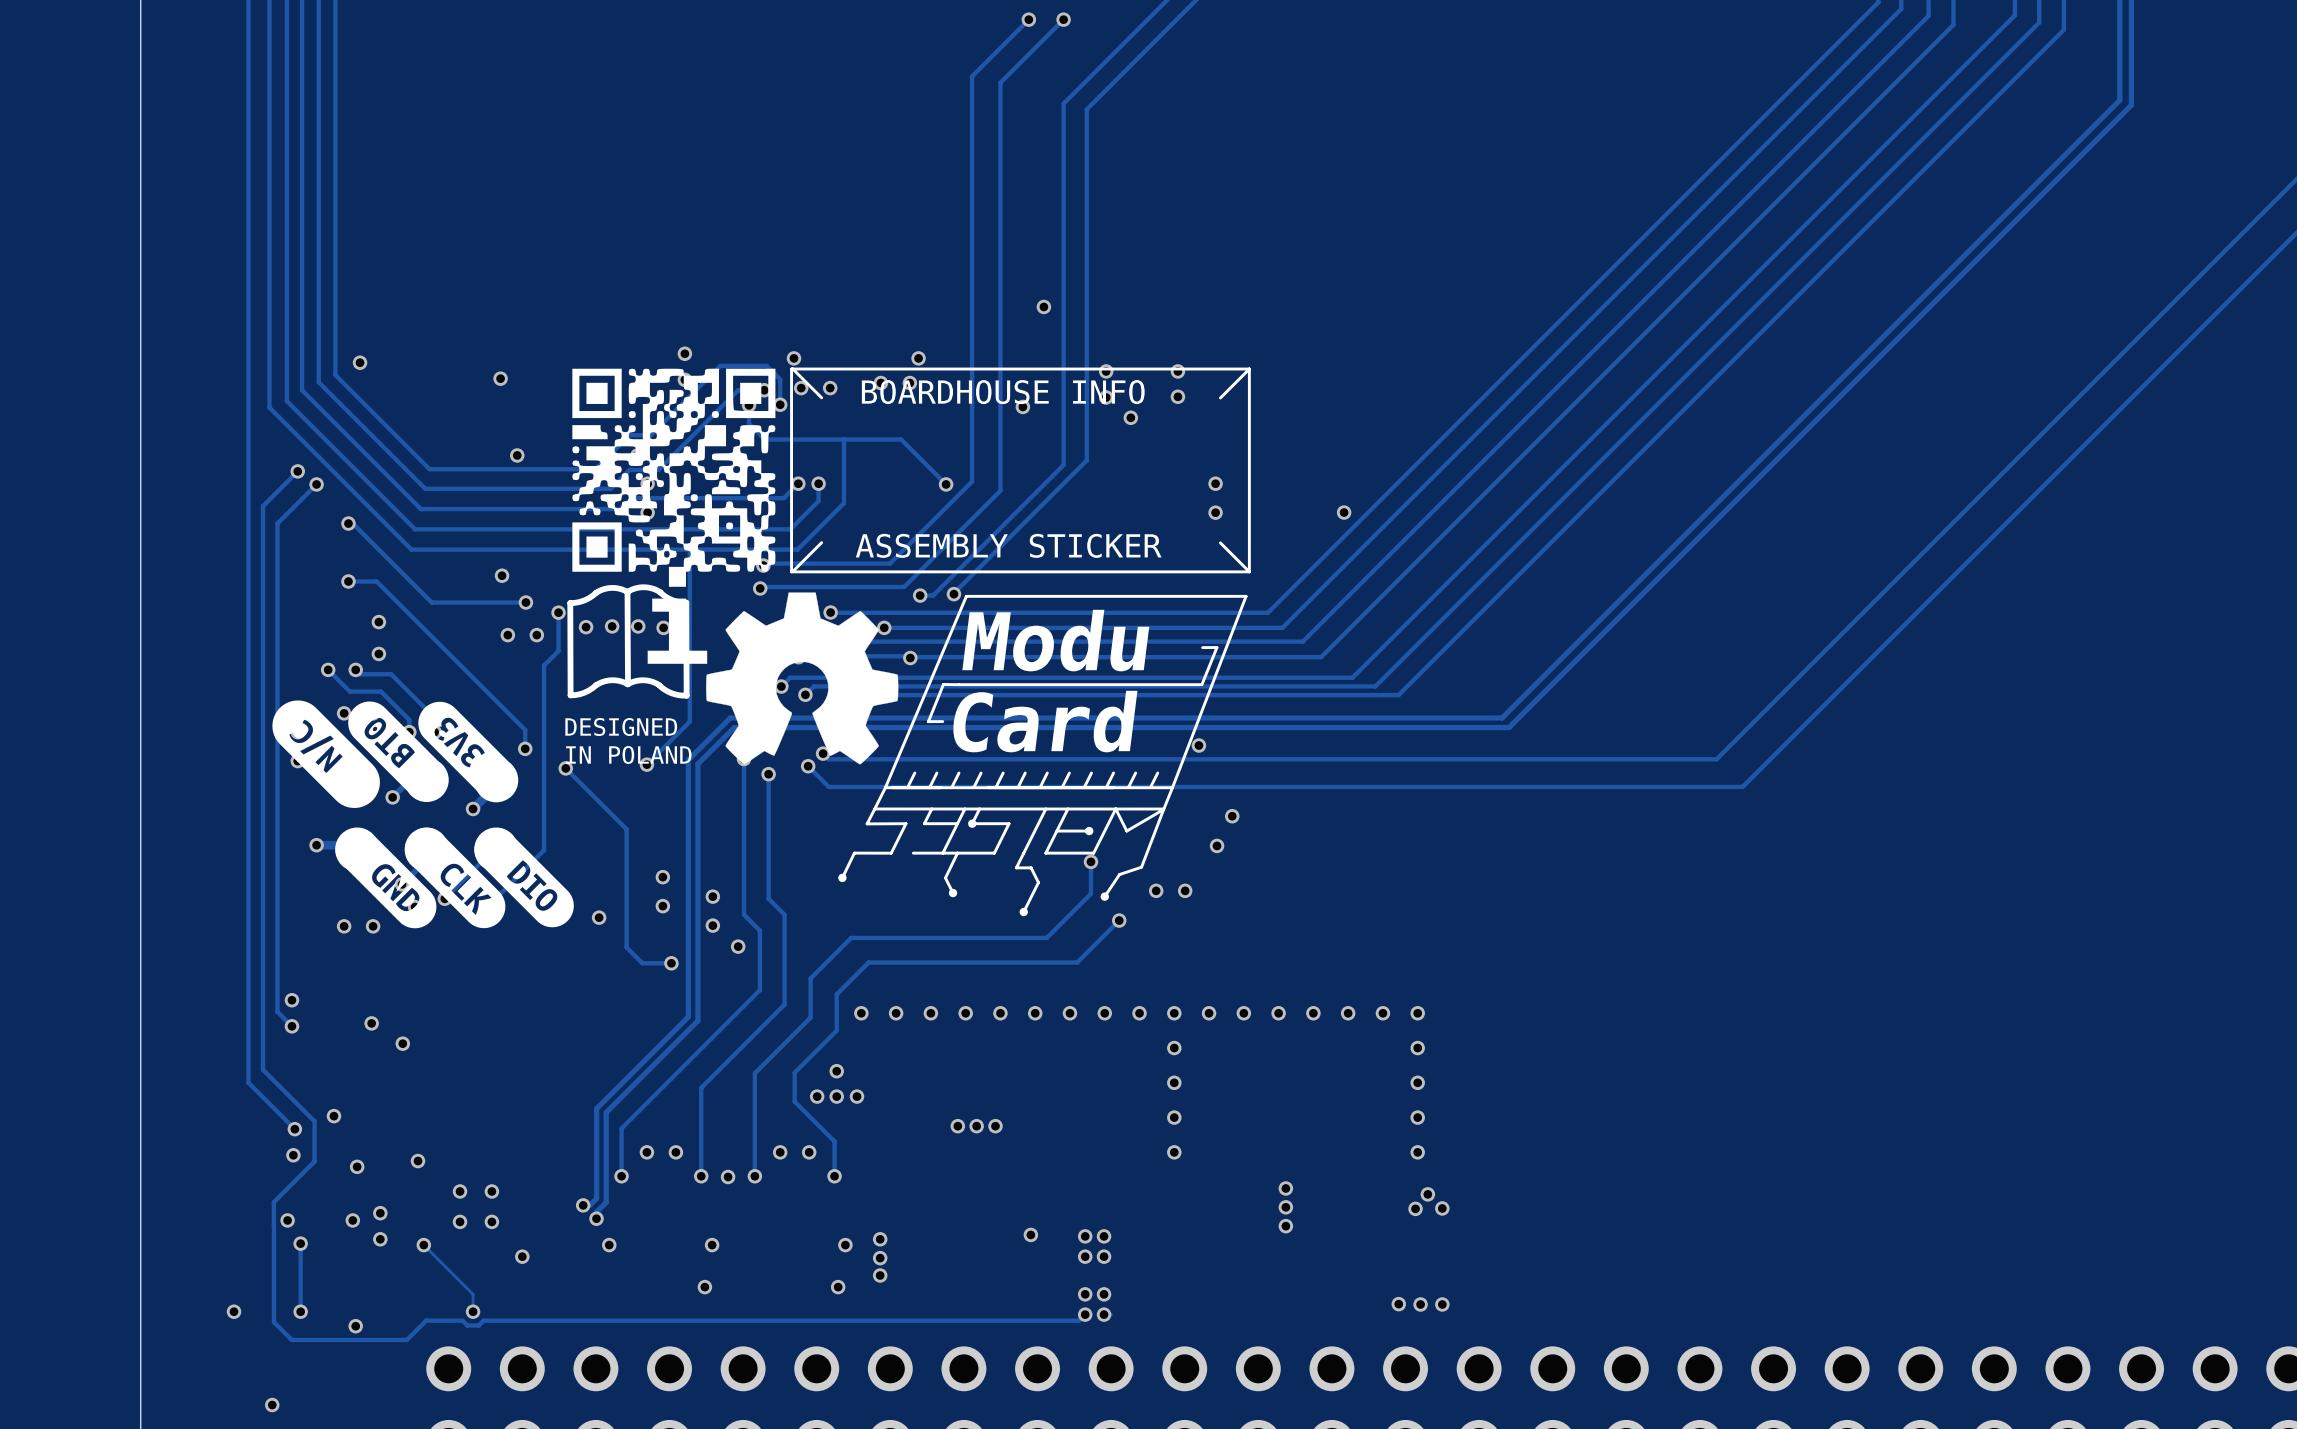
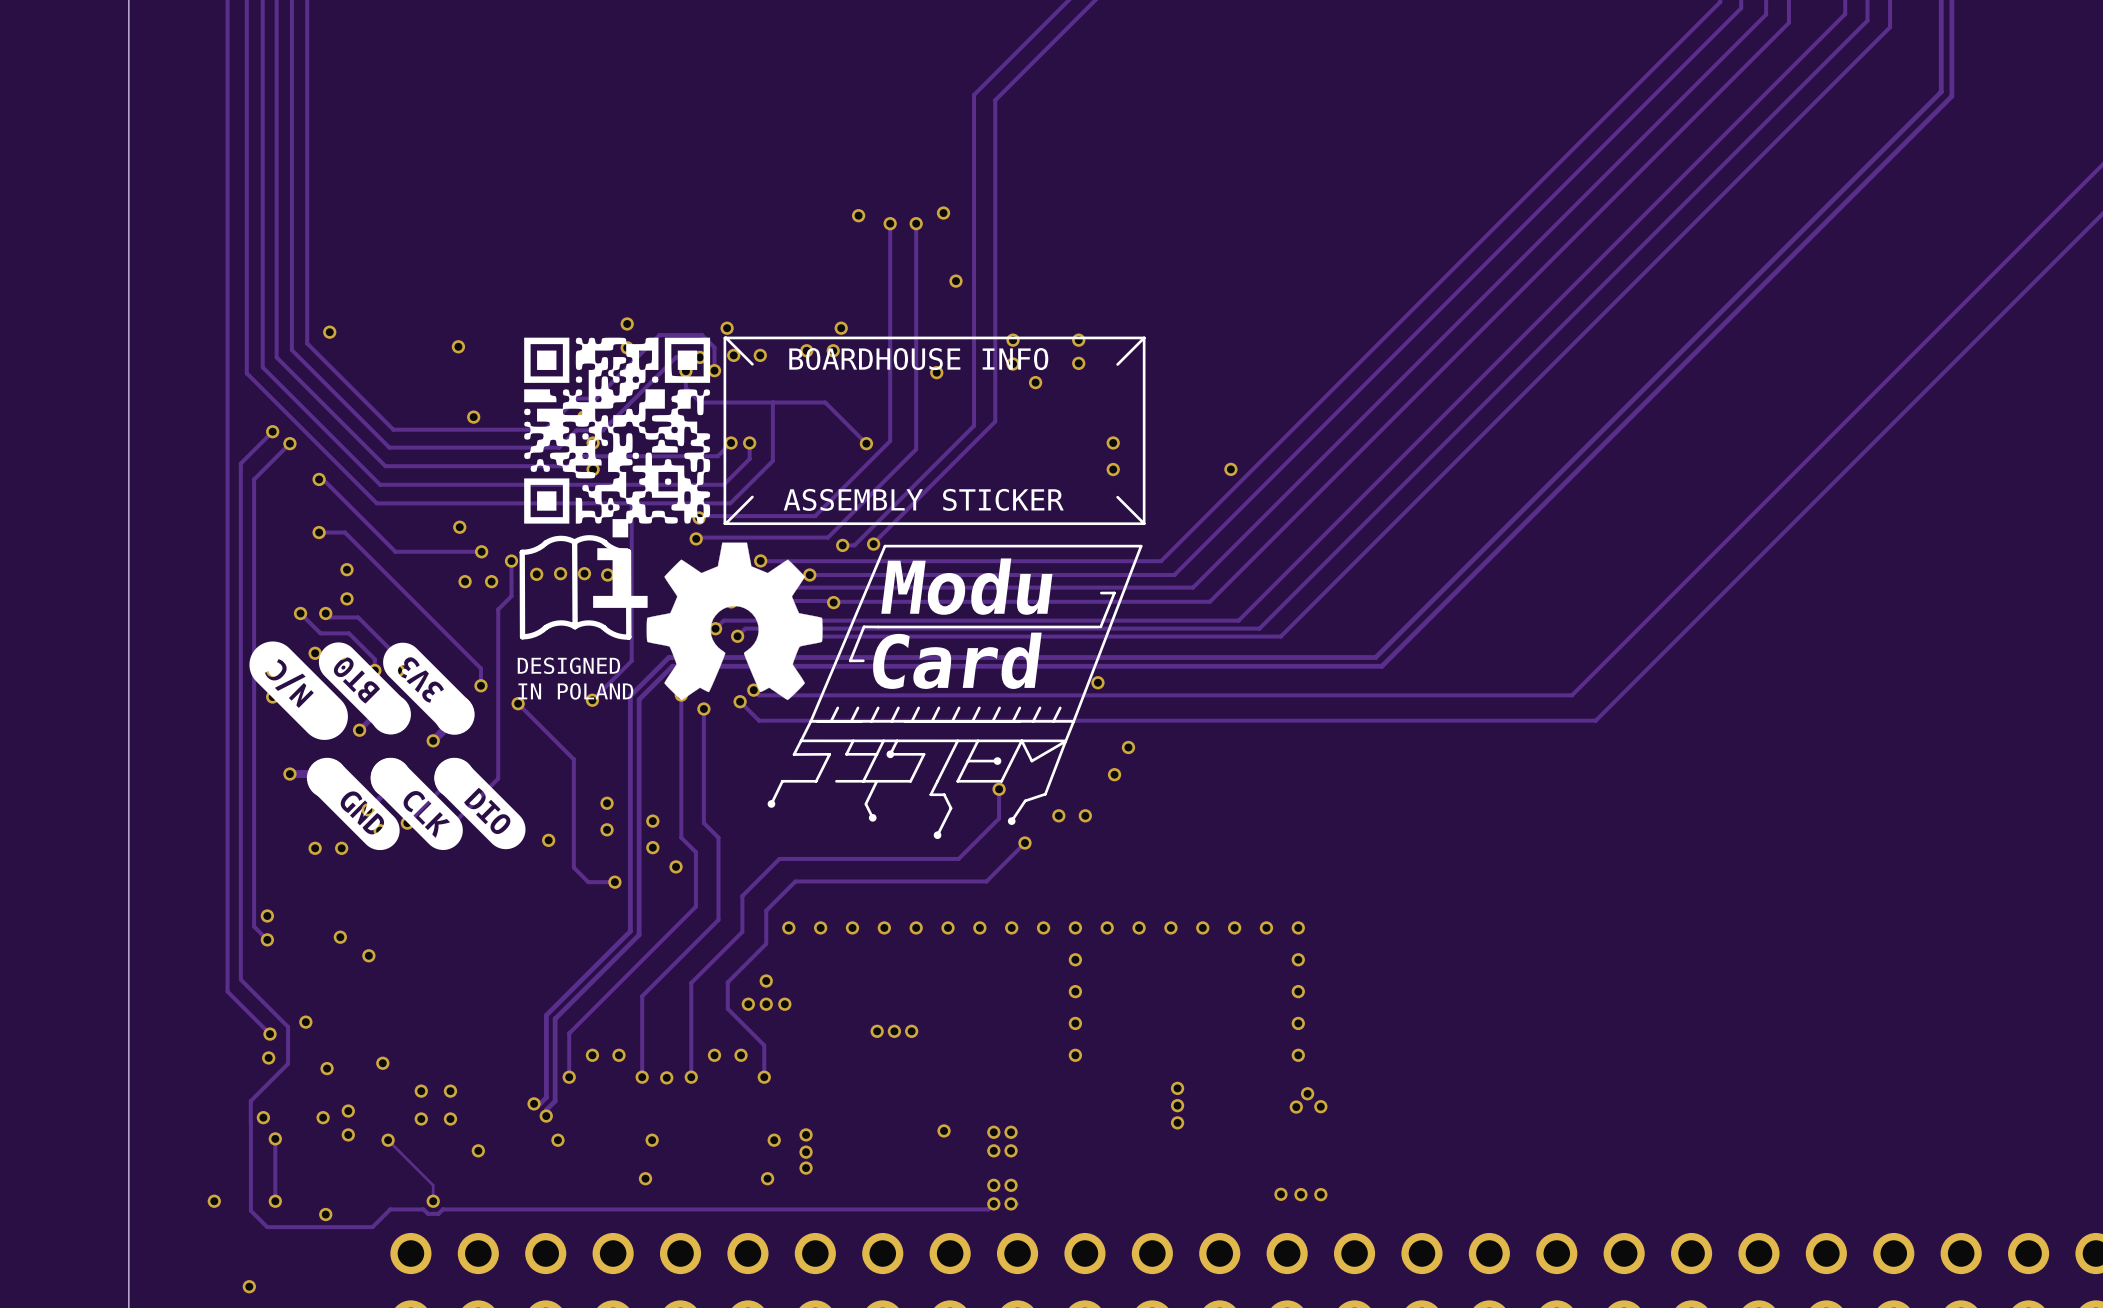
track: (1028, 19) (972, 76) (972, 244) -> none
via: (1028, 19) -> none
track: (1063, 19) (1000, 82) (1000, 244) -> none
via: (1063, 19) -> none
via: none -> (943, 213)
via: none -> (858, 215)
via: none -> (890, 223)
via: none -> (916, 223)

